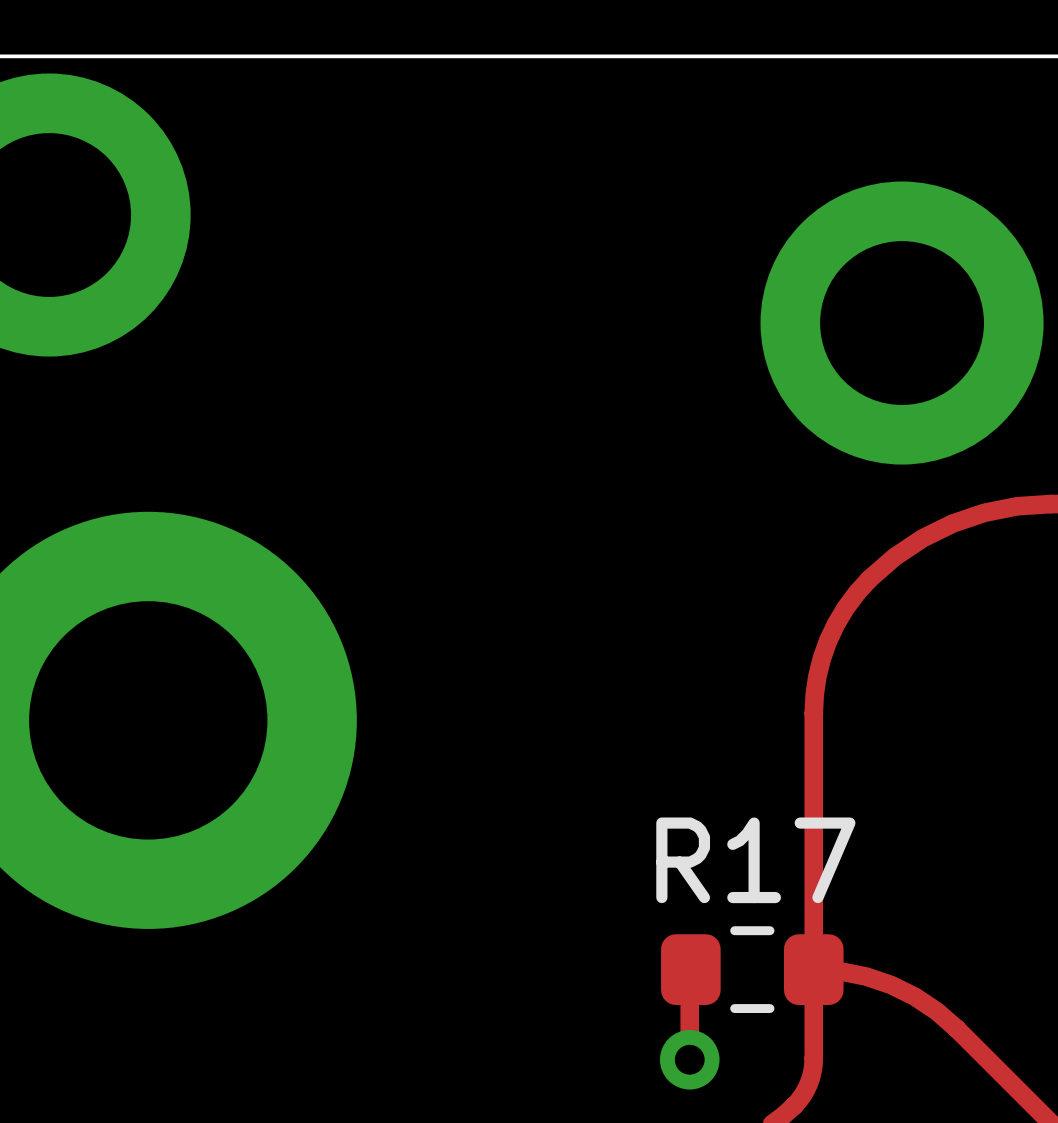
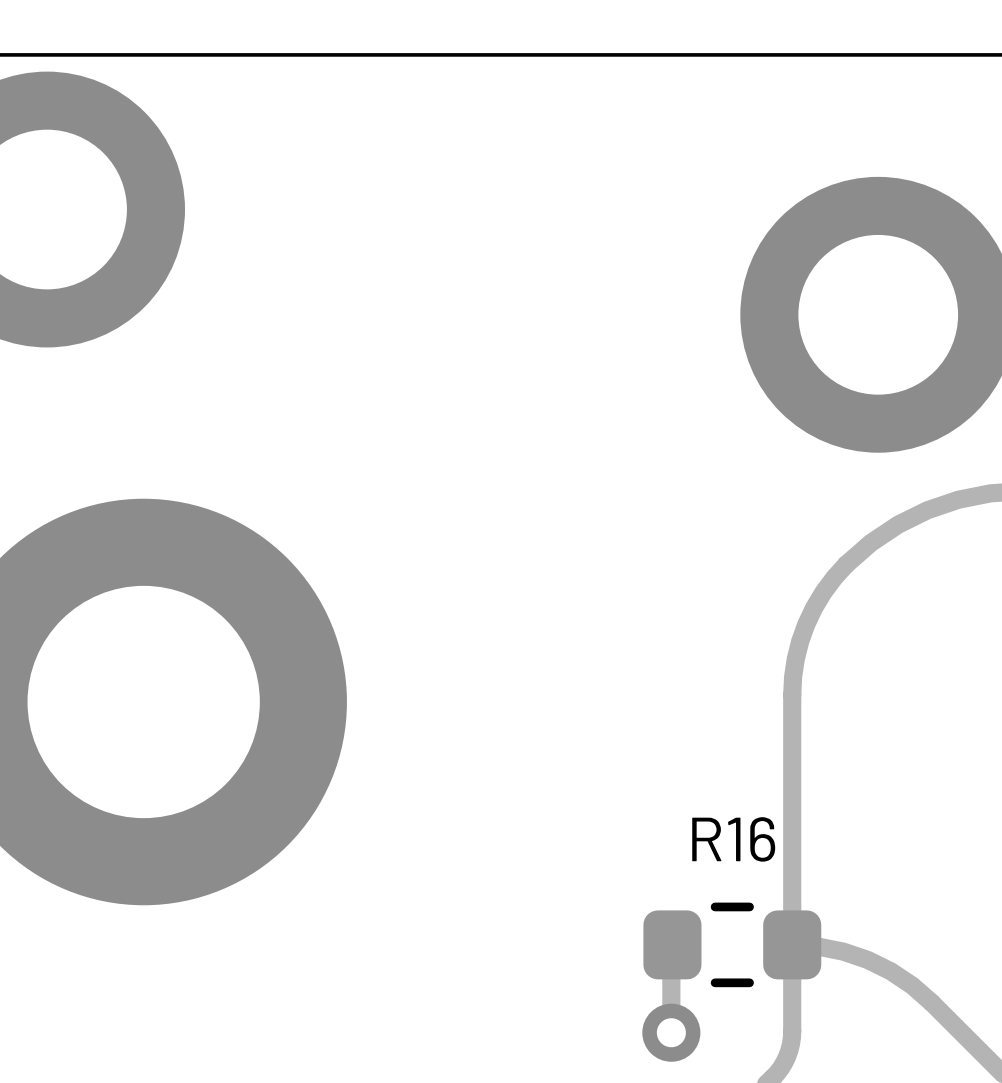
R17 name: R17 (755, 860) -> R16 (733, 839)

